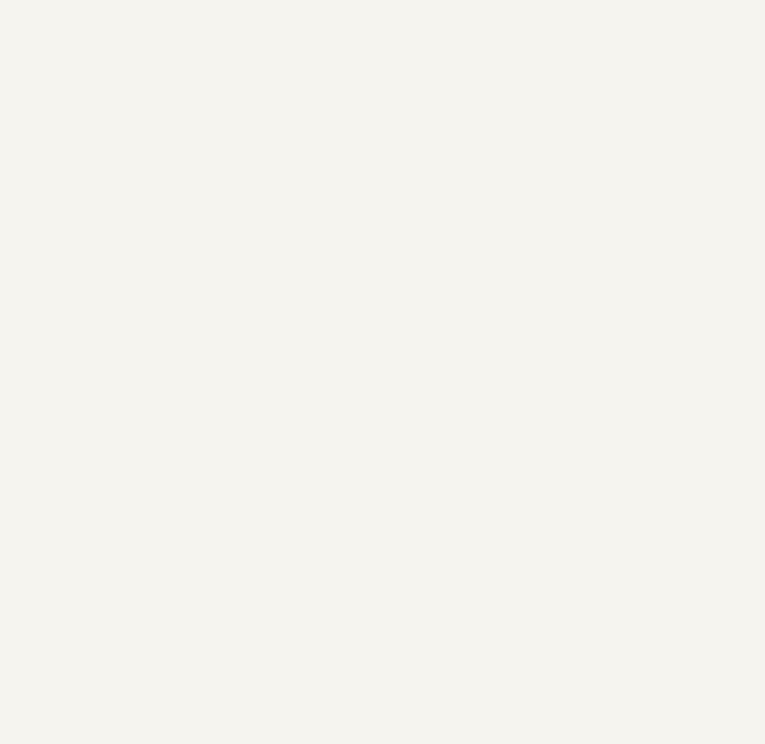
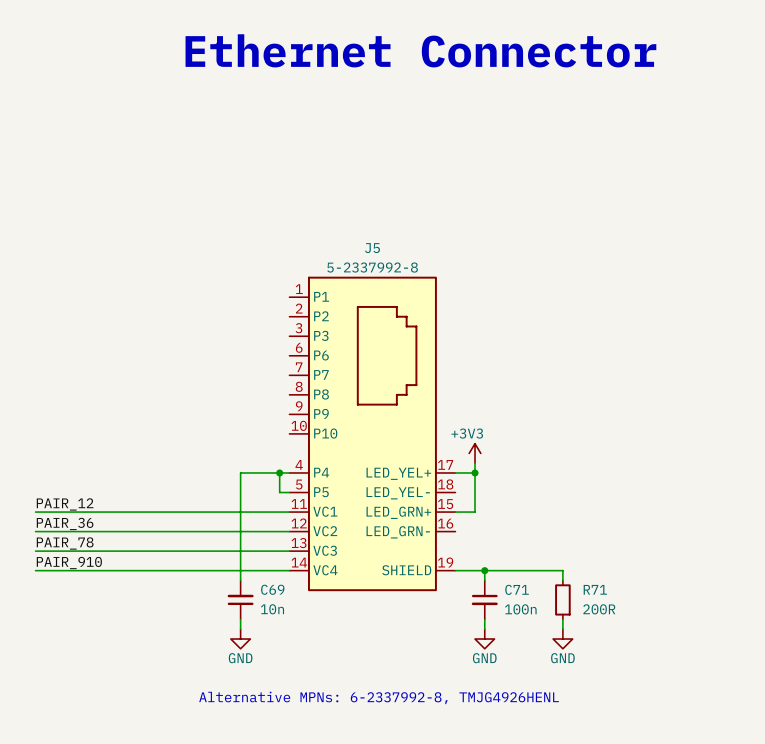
text: none -> Ethernet Connector (420, 50)
J5: none -> (372, 433)
power symbol: none -> +3V3 (475, 453)
wire: none -> (475, 463) (475, 512) (455, 512)
wire: none -> (279, 472) (279, 492) (289, 492)
junction: none -> (279, 472)
wire: none -> (289, 472) (240, 472) (240, 580)
wire: none -> (455, 472) (475, 472)
junction: none -> (475, 472)
label: none -> PAIR_12 (65, 504)
wire: none -> (35, 512) (289, 512)
label: none -> PAIR_36 (65, 523)
wire: none -> (35, 531) (289, 531)
label: none -> PAIR_78 (65, 543)
wire: none -> (35, 551) (289, 551)
label: none -> PAIR_910 (69, 563)
wire: none -> (35, 570) (289, 570)
wire: none -> (455, 570) (562, 570) (562, 580)
wire: none -> (484, 570) (484, 580)
junction: none -> (484, 570)
C69: none -> (240, 599)
C71: none -> (484, 599)
R71: none -> (562, 599)
wire: none -> (240, 619) (240, 629)
wire: none -> (484, 619) (484, 629)
wire: none -> (562, 619) (562, 629)
power symbol: none -> GND (240, 639)
power symbol: none -> GND (484, 639)
power symbol: none -> GND (562, 639)
text: none -> Alternative MPNs: 6-2337992-8, TMJG4926HENL (379, 697)

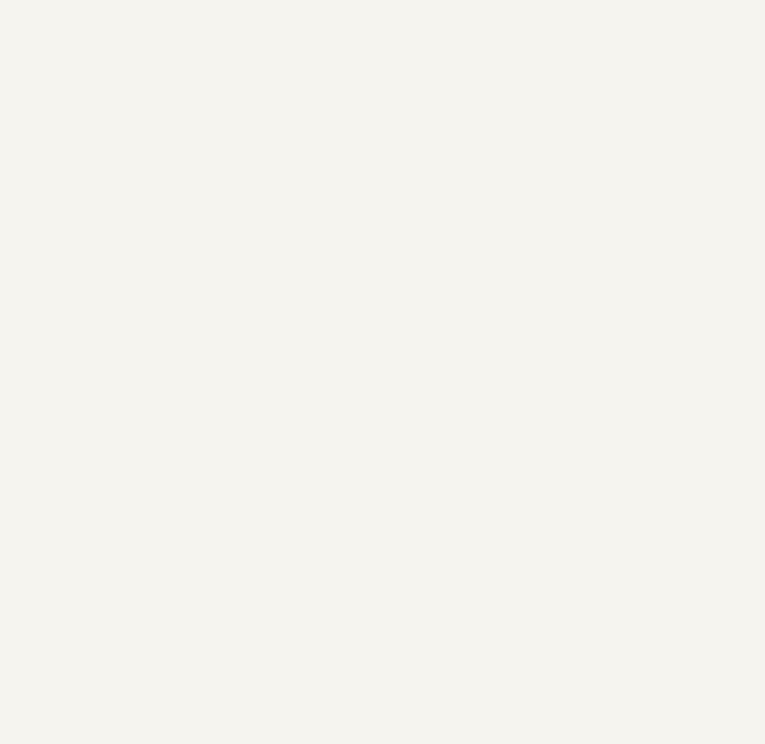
text: Ethernet Connector (420, 50) -> none
J5: (372, 433) -> none
power symbol: +3V3 (475, 453) -> none
wire: (475, 463) (475, 512) (455, 512) -> none
wire: (279, 472) (279, 492) (289, 492) -> none
junction: (279, 472) -> none
wire: (289, 472) (240, 472) (240, 580) -> none
wire: (455, 472) (475, 472) -> none
junction: (475, 472) -> none
label: PAIR_12 (65, 504) -> none
wire: (35, 512) (289, 512) -> none
label: PAIR_36 (65, 523) -> none
wire: (35, 531) (289, 531) -> none
label: PAIR_78 (65, 543) -> none
wire: (35, 551) (289, 551) -> none
label: PAIR_910 (69, 563) -> none
wire: (35, 570) (289, 570) -> none
wire: (455, 570) (562, 570) (562, 580) -> none
wire: (484, 570) (484, 580) -> none
junction: (484, 570) -> none
C69: (240, 599) -> none
C71: (484, 599) -> none
R71: (562, 599) -> none
wire: (240, 619) (240, 629) -> none
wire: (484, 619) (484, 629) -> none
wire: (562, 619) (562, 629) -> none
power symbol: GND (240, 639) -> none
power symbol: GND (484, 639) -> none
power symbol: GND (562, 639) -> none
text: Alternative MPNs: 6-2337992-8, TMJG4926HENL (379, 697) -> none

